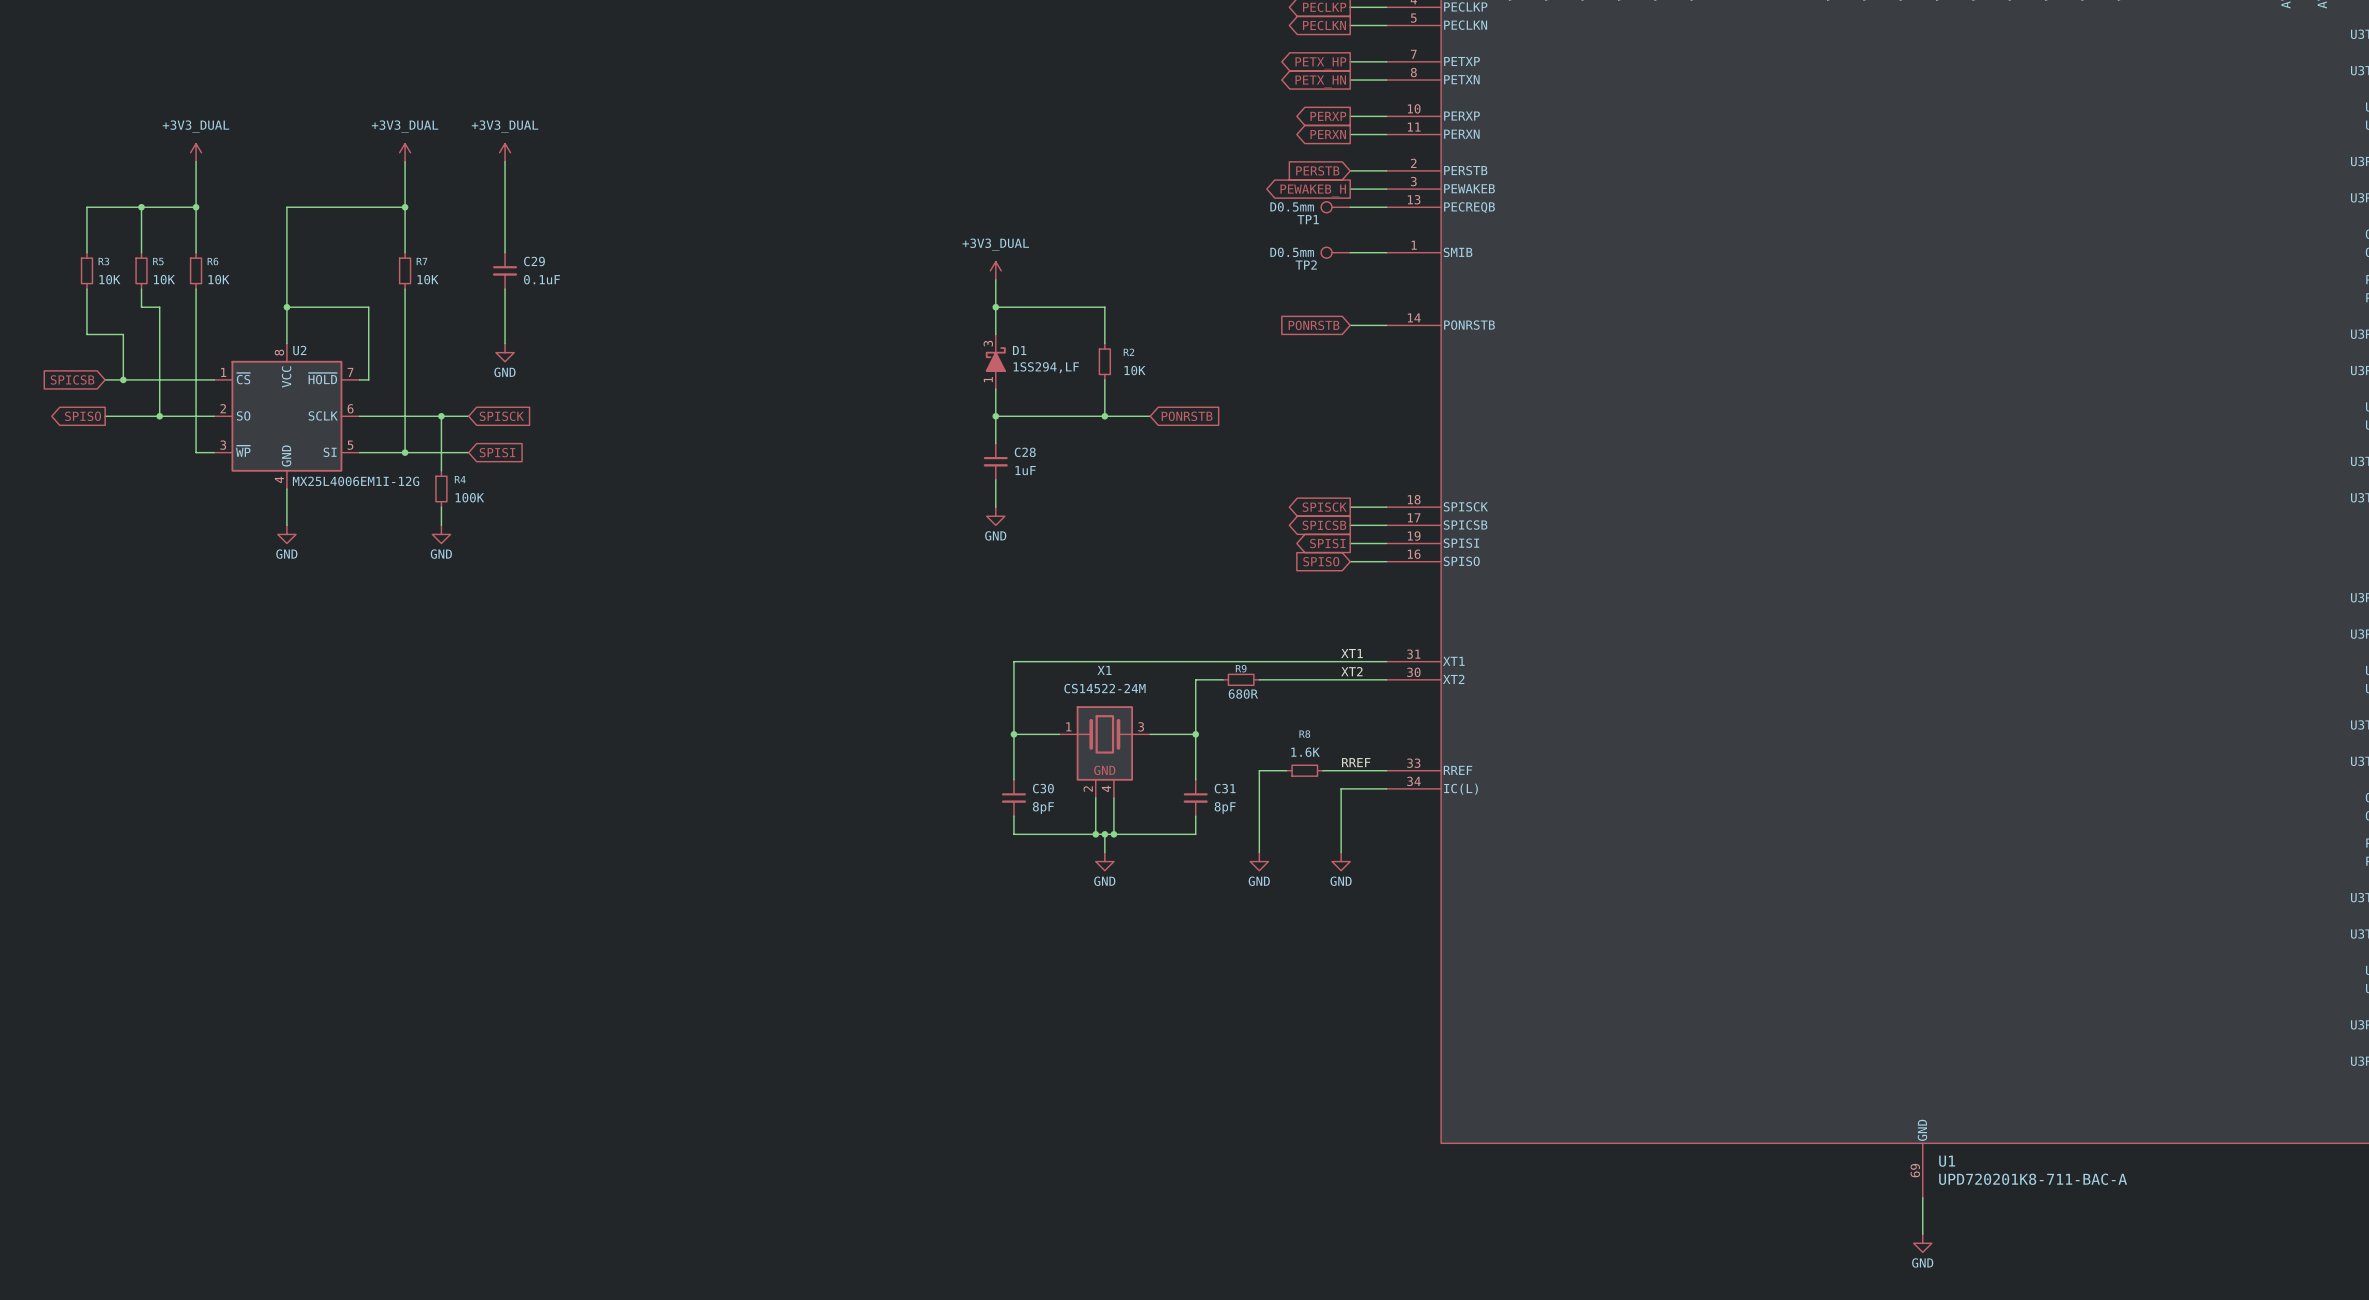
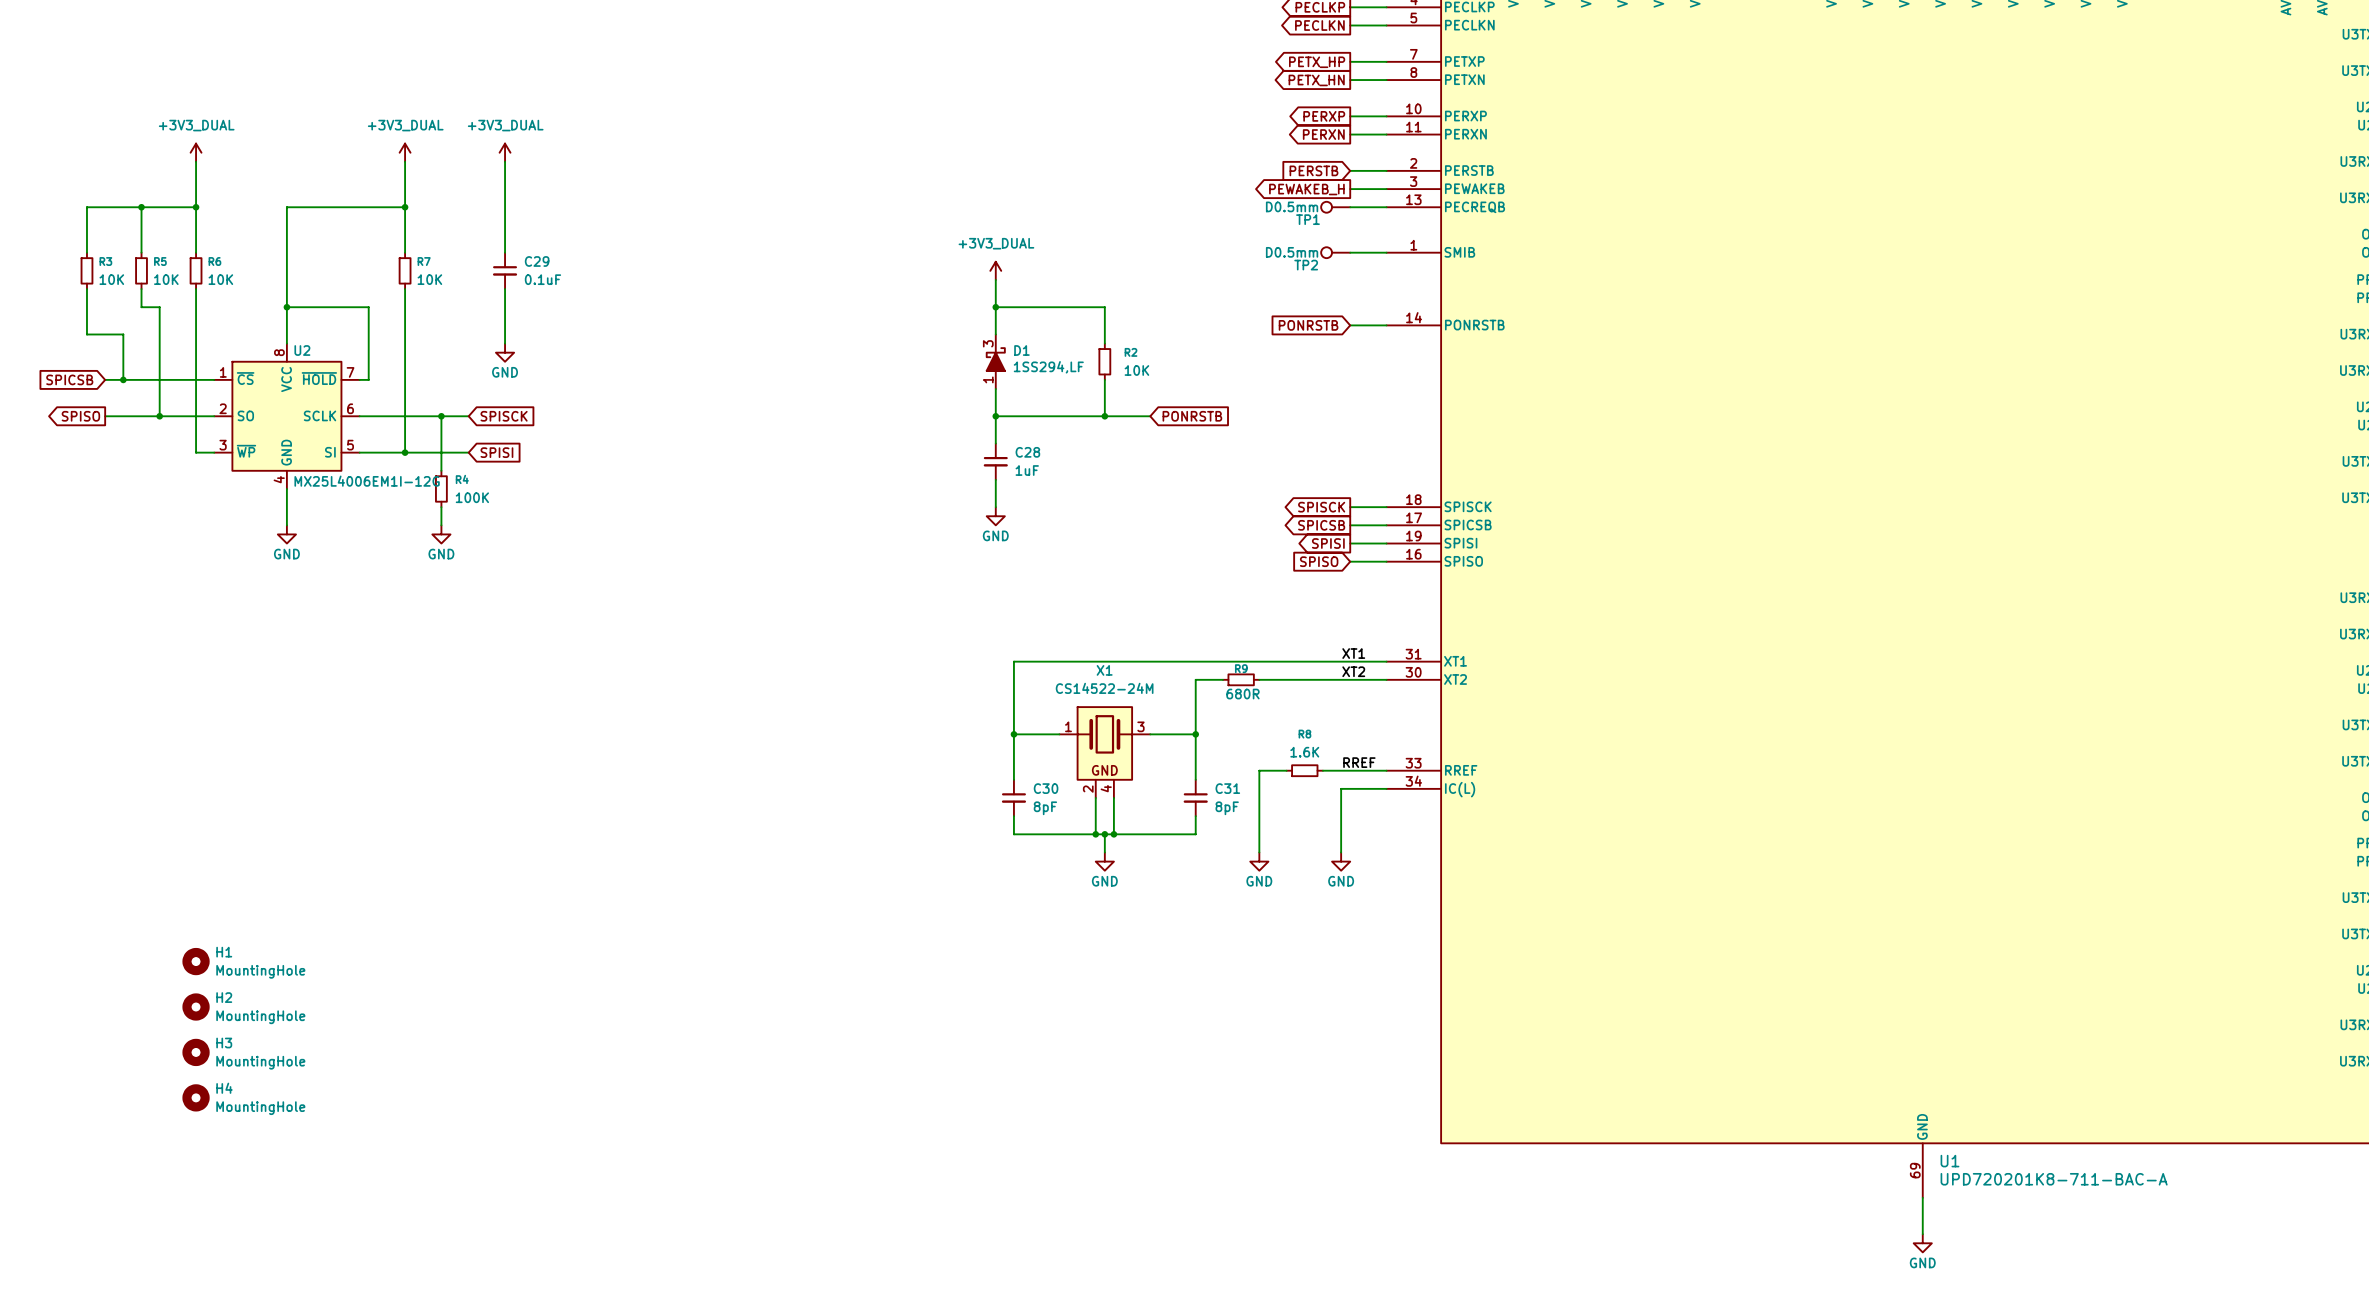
H1: none -> MountingHole (196, 961)
H2: none -> MountingHole (196, 1007)
H3: none -> MountingHole (196, 1052)
H4: none -> MountingHole (196, 1097)

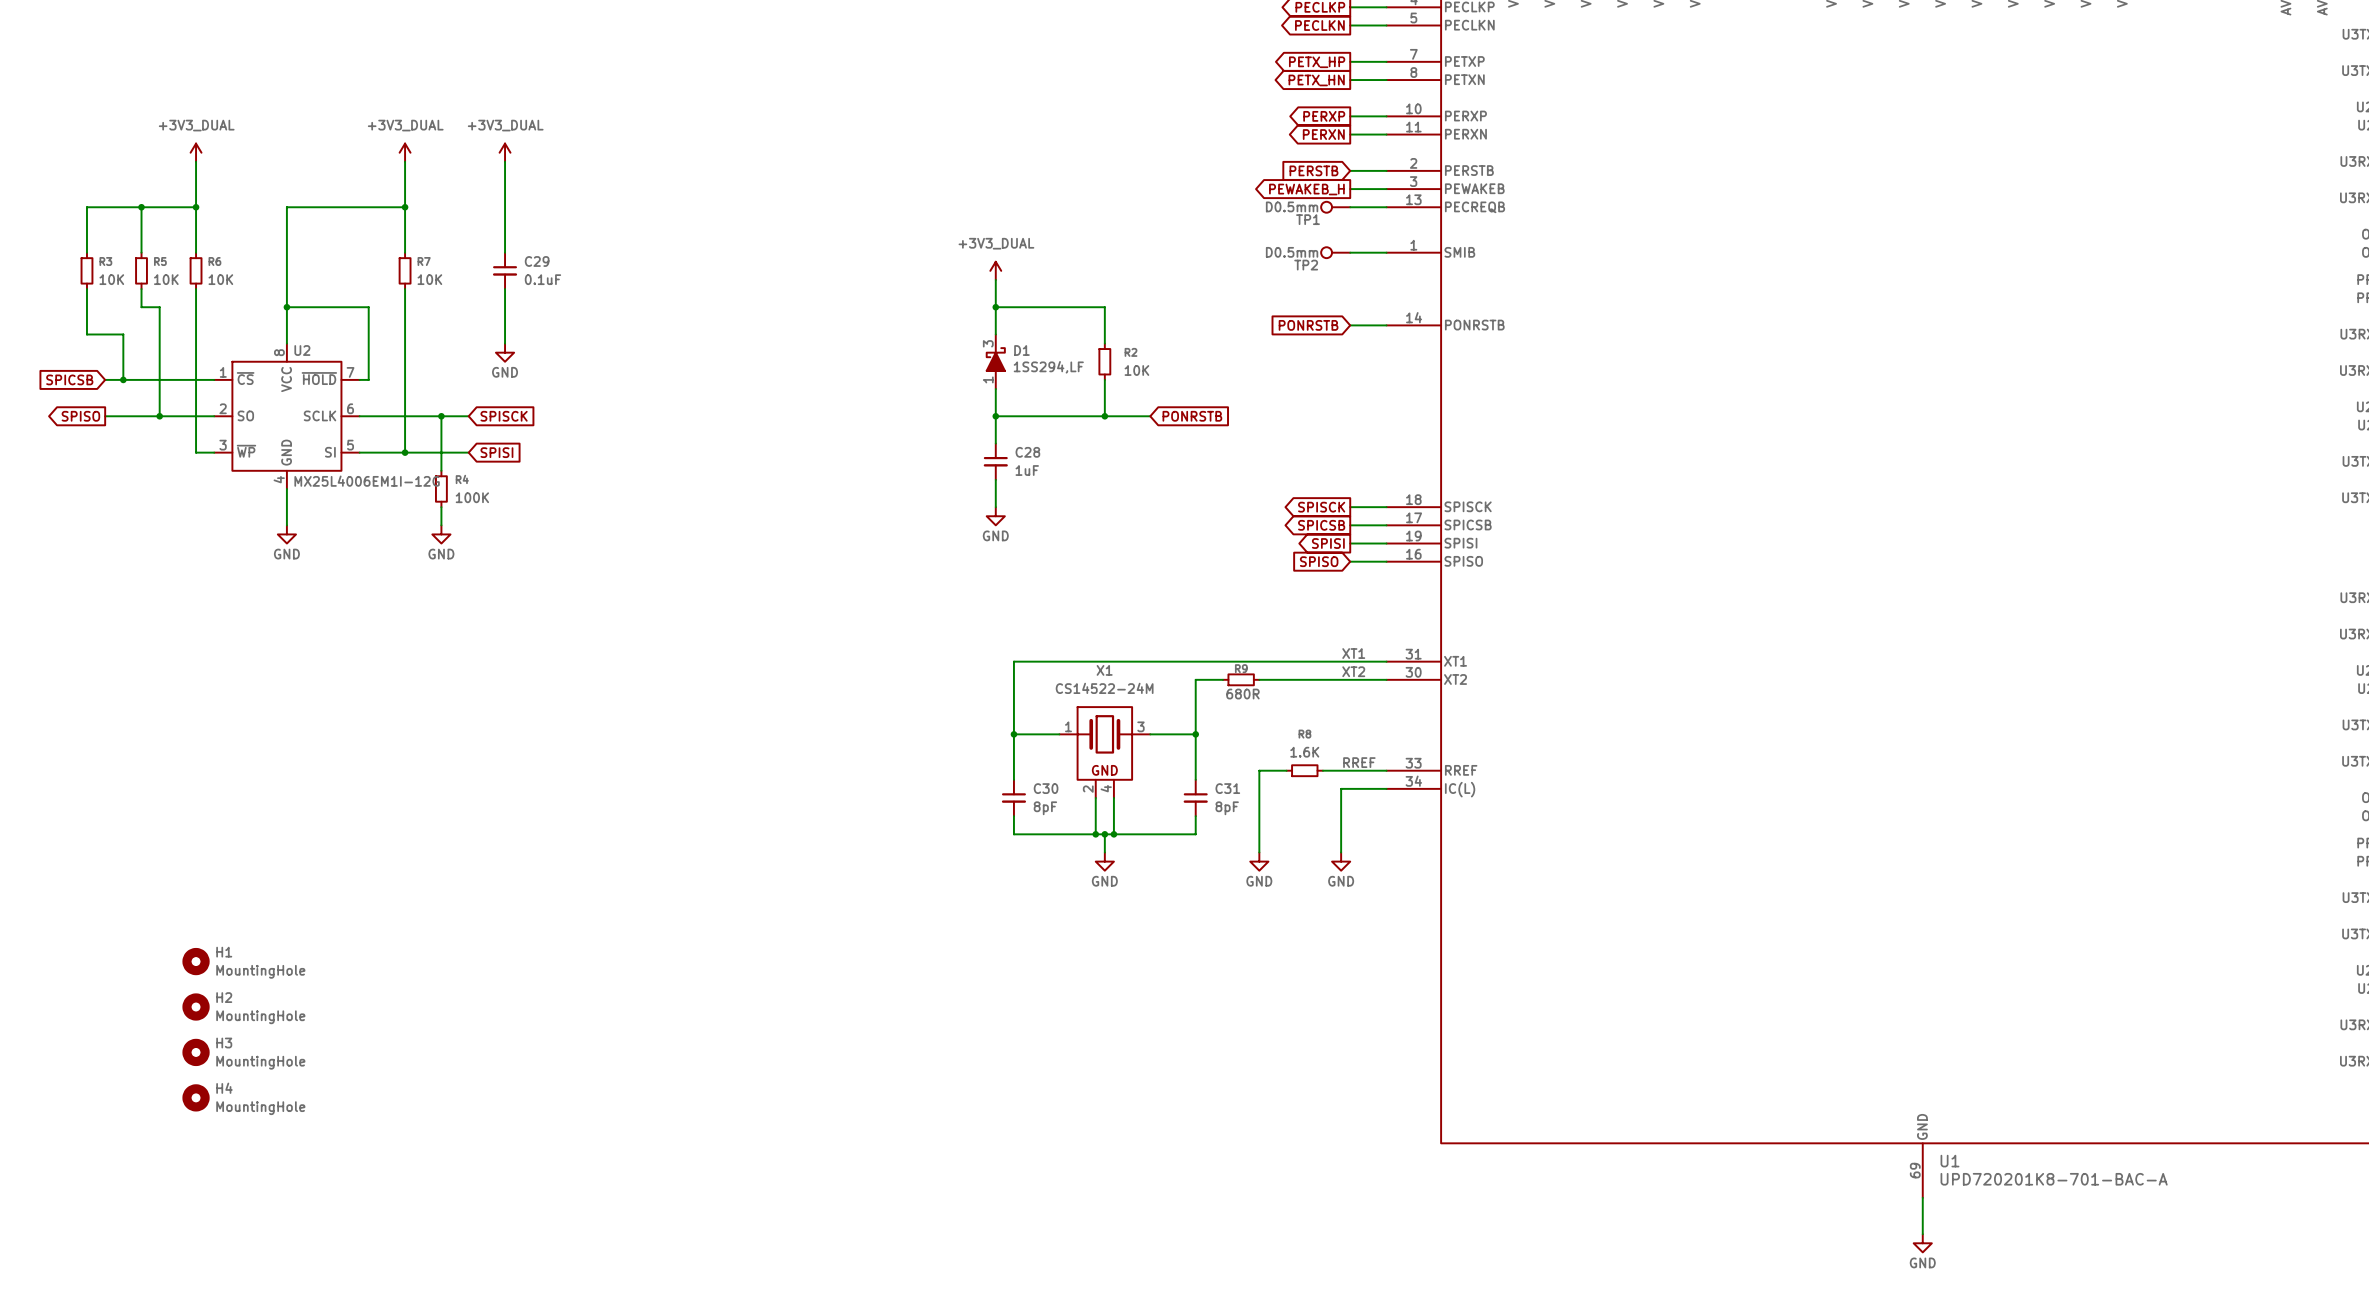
U1 value: UPD720201K8-711-BAC-A (2054, 1179) -> UPD720201K8-701-BAC-A (2054, 1179)

